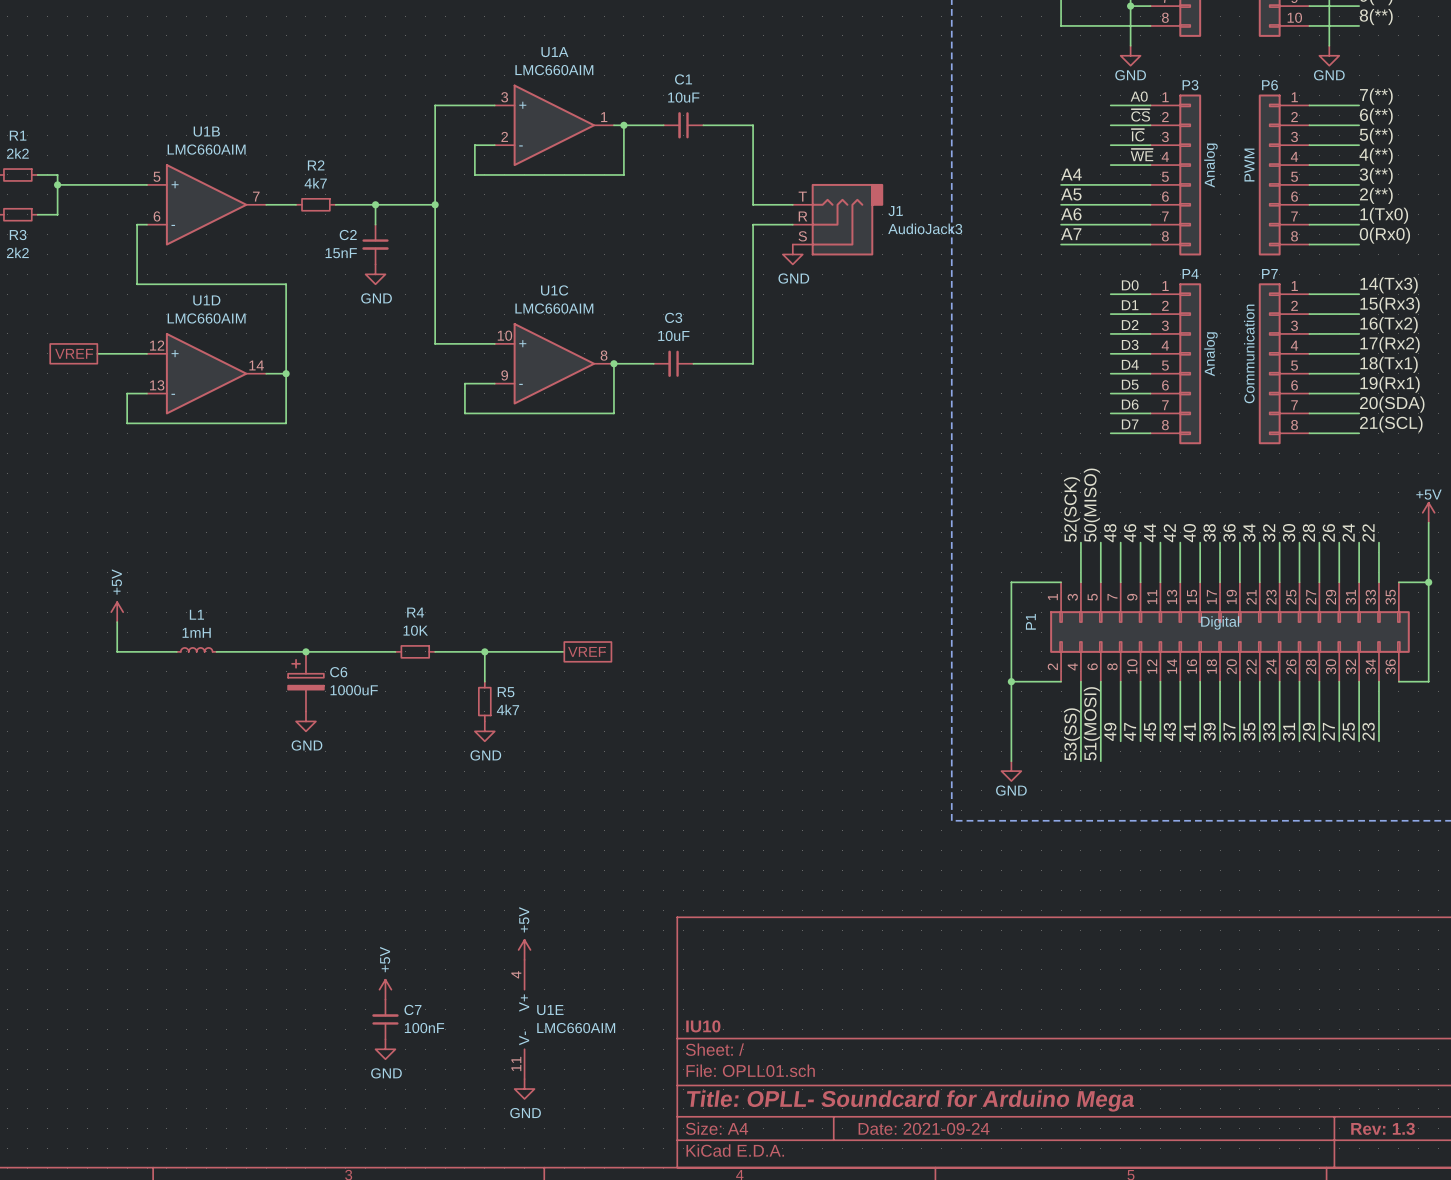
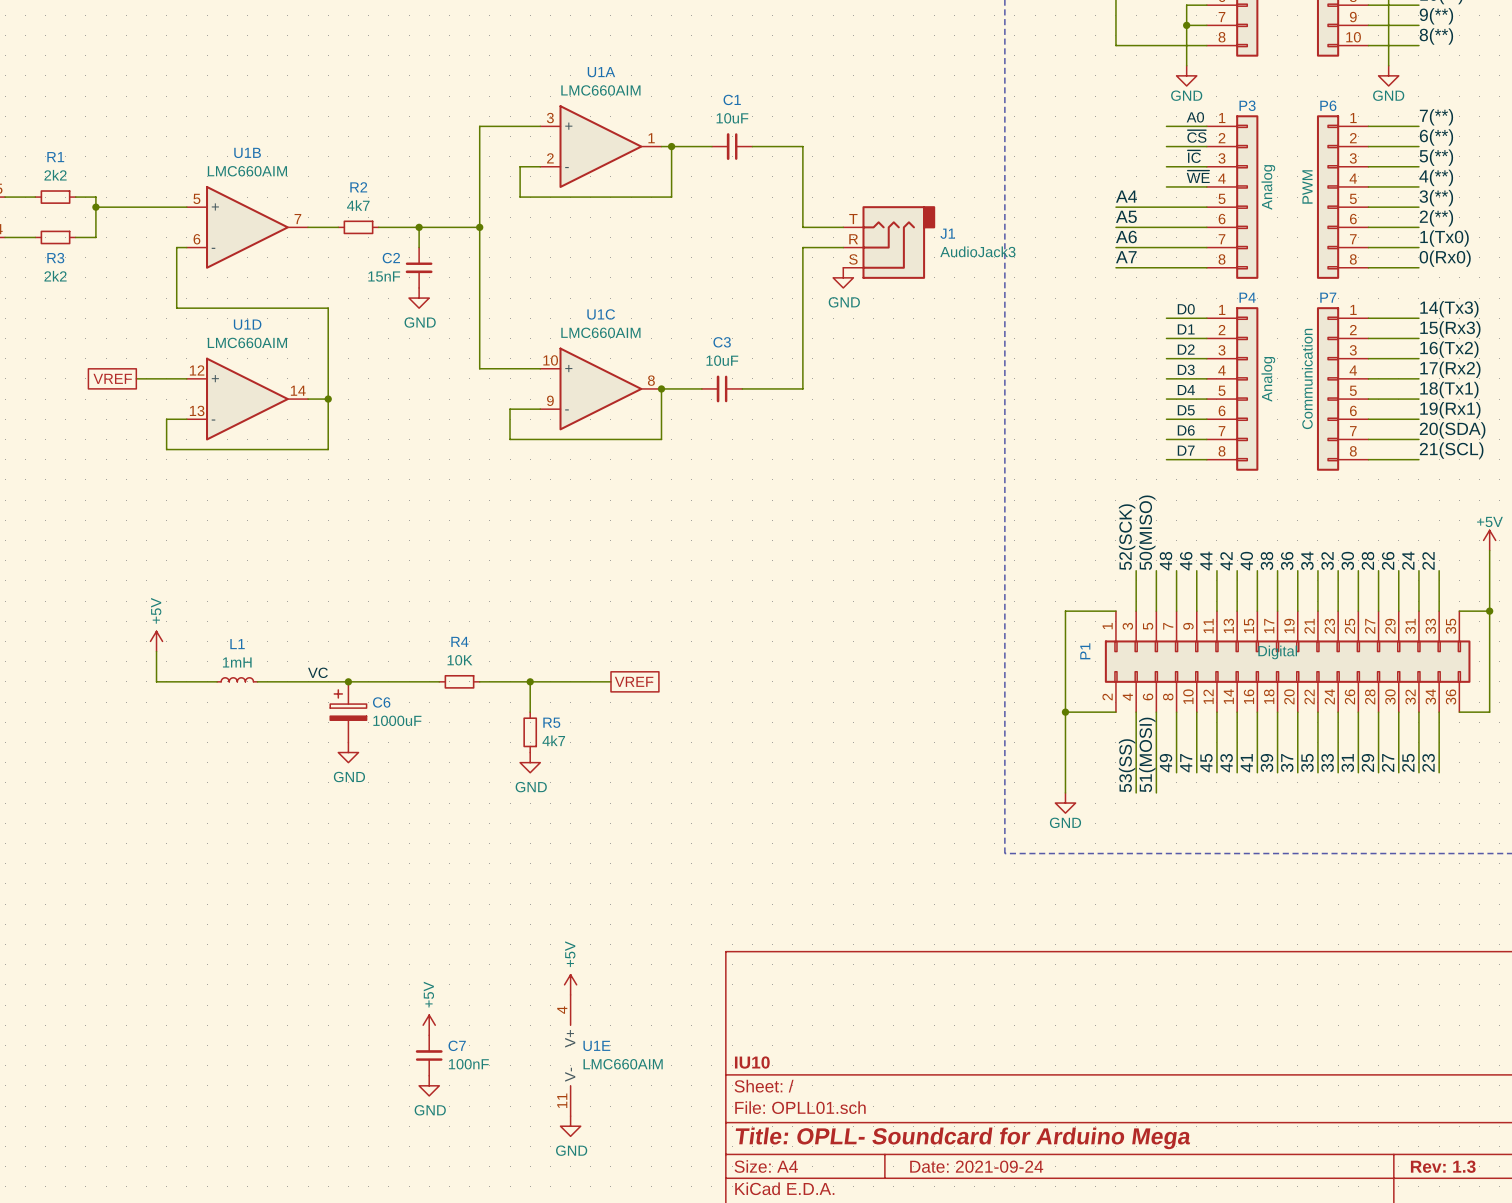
label: none -> VC (317, 672)

